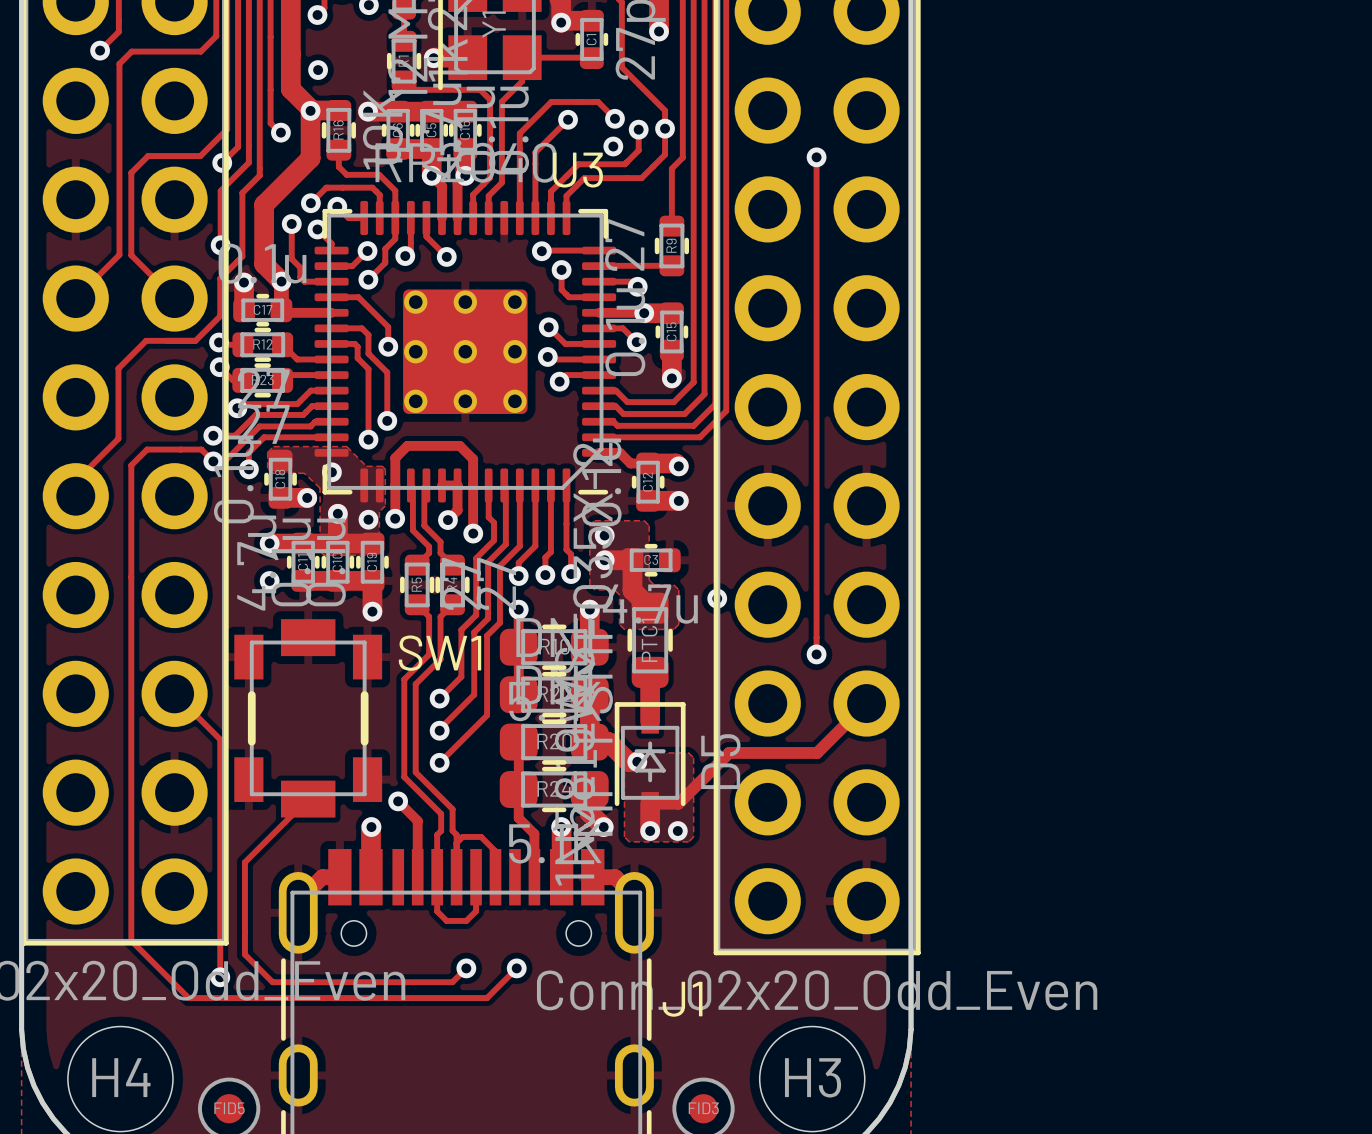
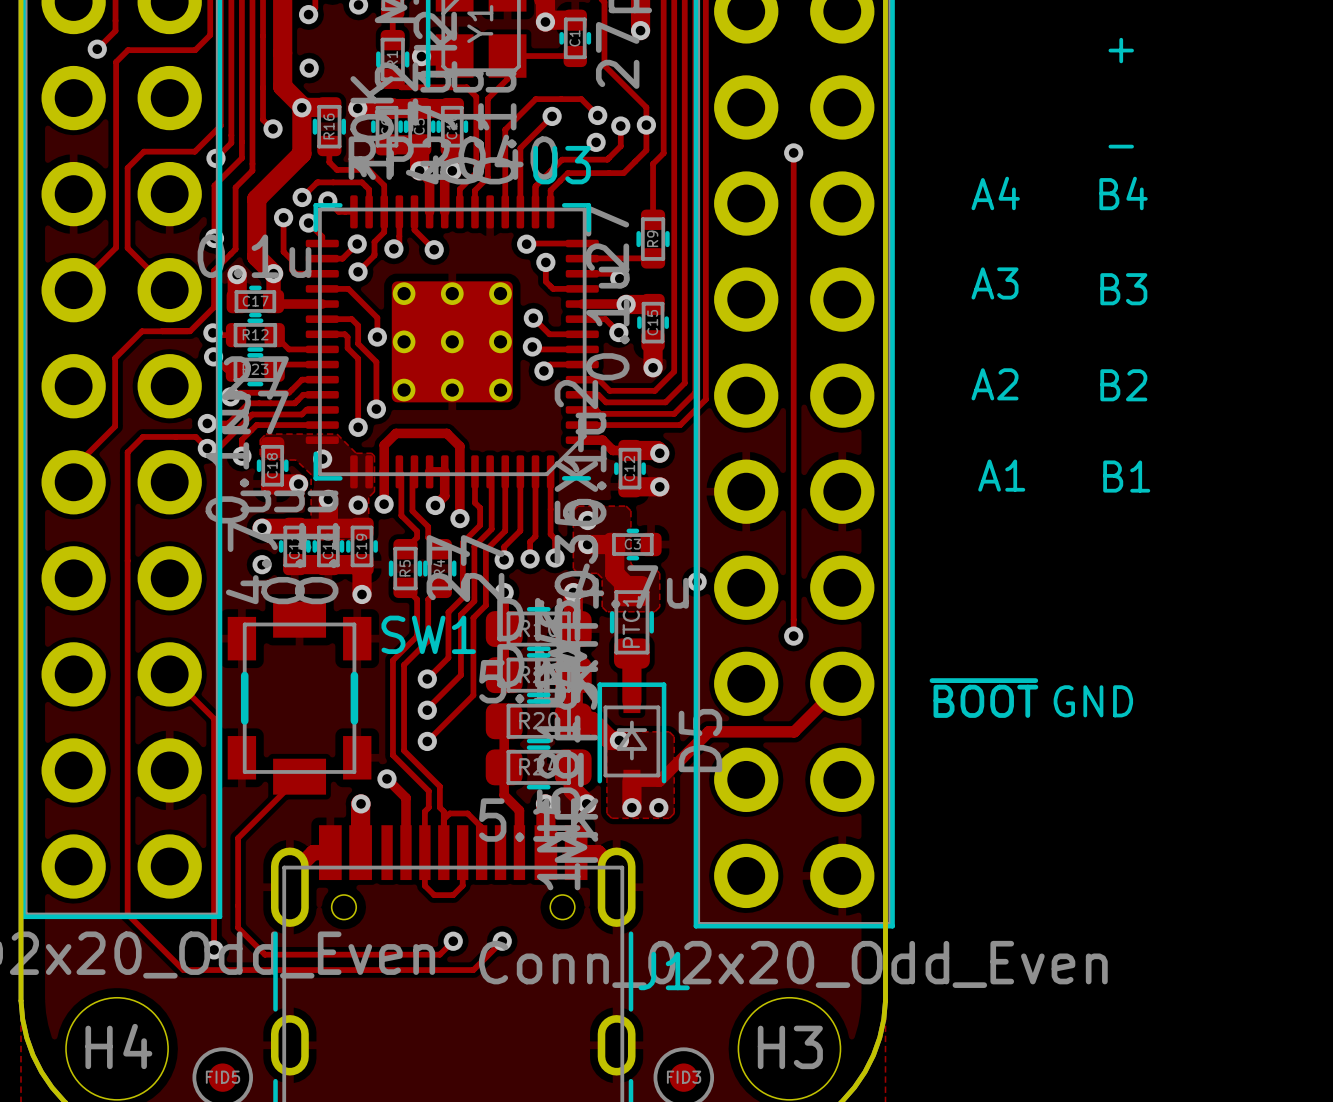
text: none -> + (1121, 50)
text: none -> - (1121, 146)
text: none -> A4 (995, 193)
text: none -> B4 (1123, 193)
text: none -> A3 (995, 283)
text: none -> B3 (1123, 289)
text: none -> A2 (995, 384)
text: none -> B2 (1123, 385)
text: none -> A1 (1001, 475)
text: none -> B1 (1126, 476)
text: none -> ~{BOOT} (983, 698)
text: none -> GND (1093, 701)

